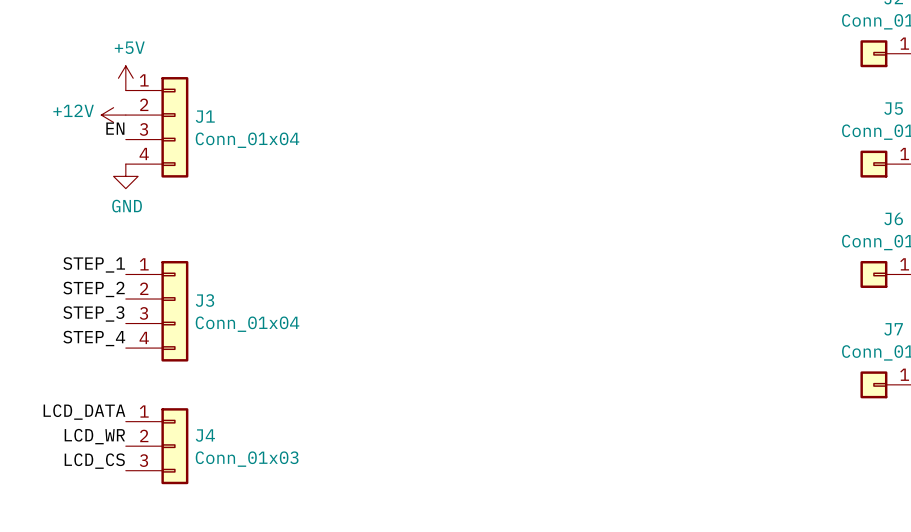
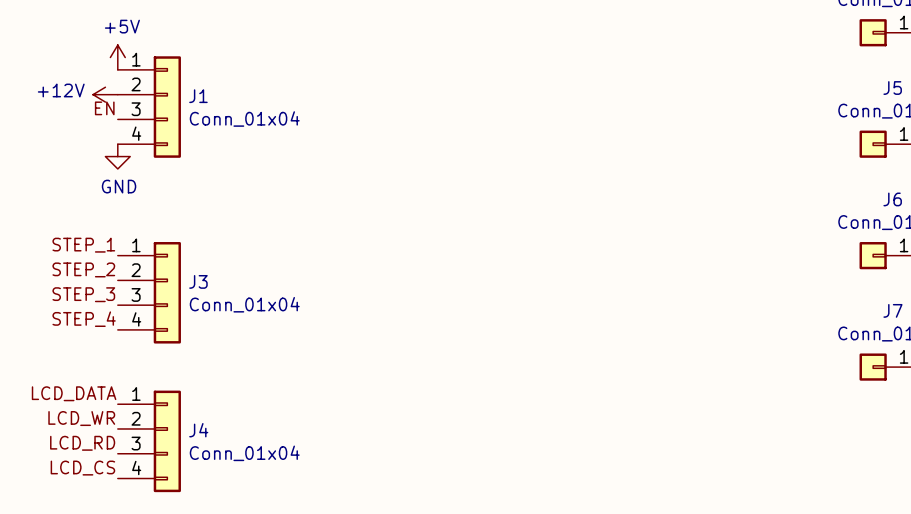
J4 symbol: [125, 408, 189, 485] -> [117, 390, 181, 493]
J4 value: Conn_01x03 (247, 459) -> Conn_01x04 (244, 453)
label: LCD_CS (94, 461) -> LCD_RD (82, 443)
label: none -> LCD_CS (82, 468)

